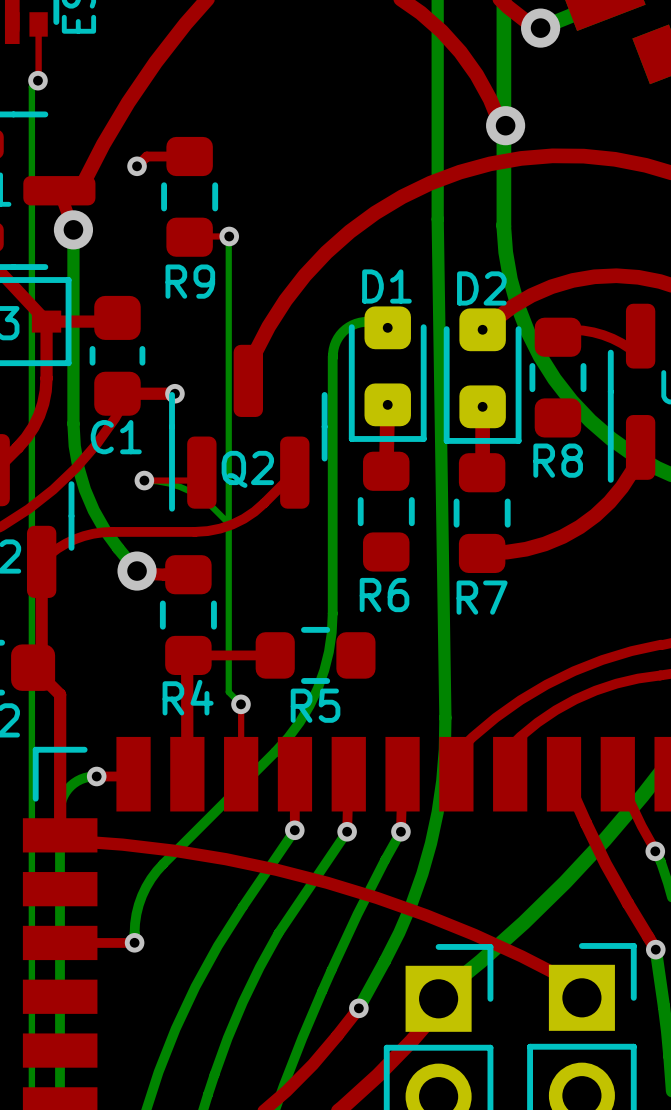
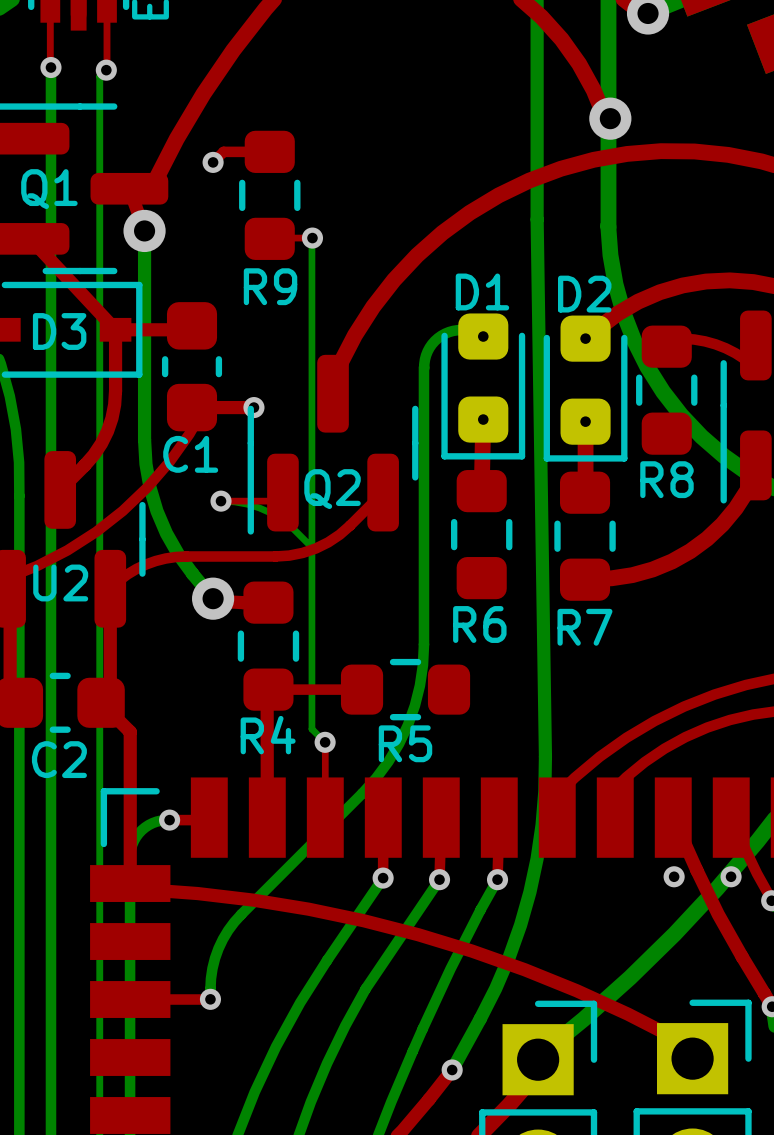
via: none -> (674, 876)
via: none -> (731, 876)

